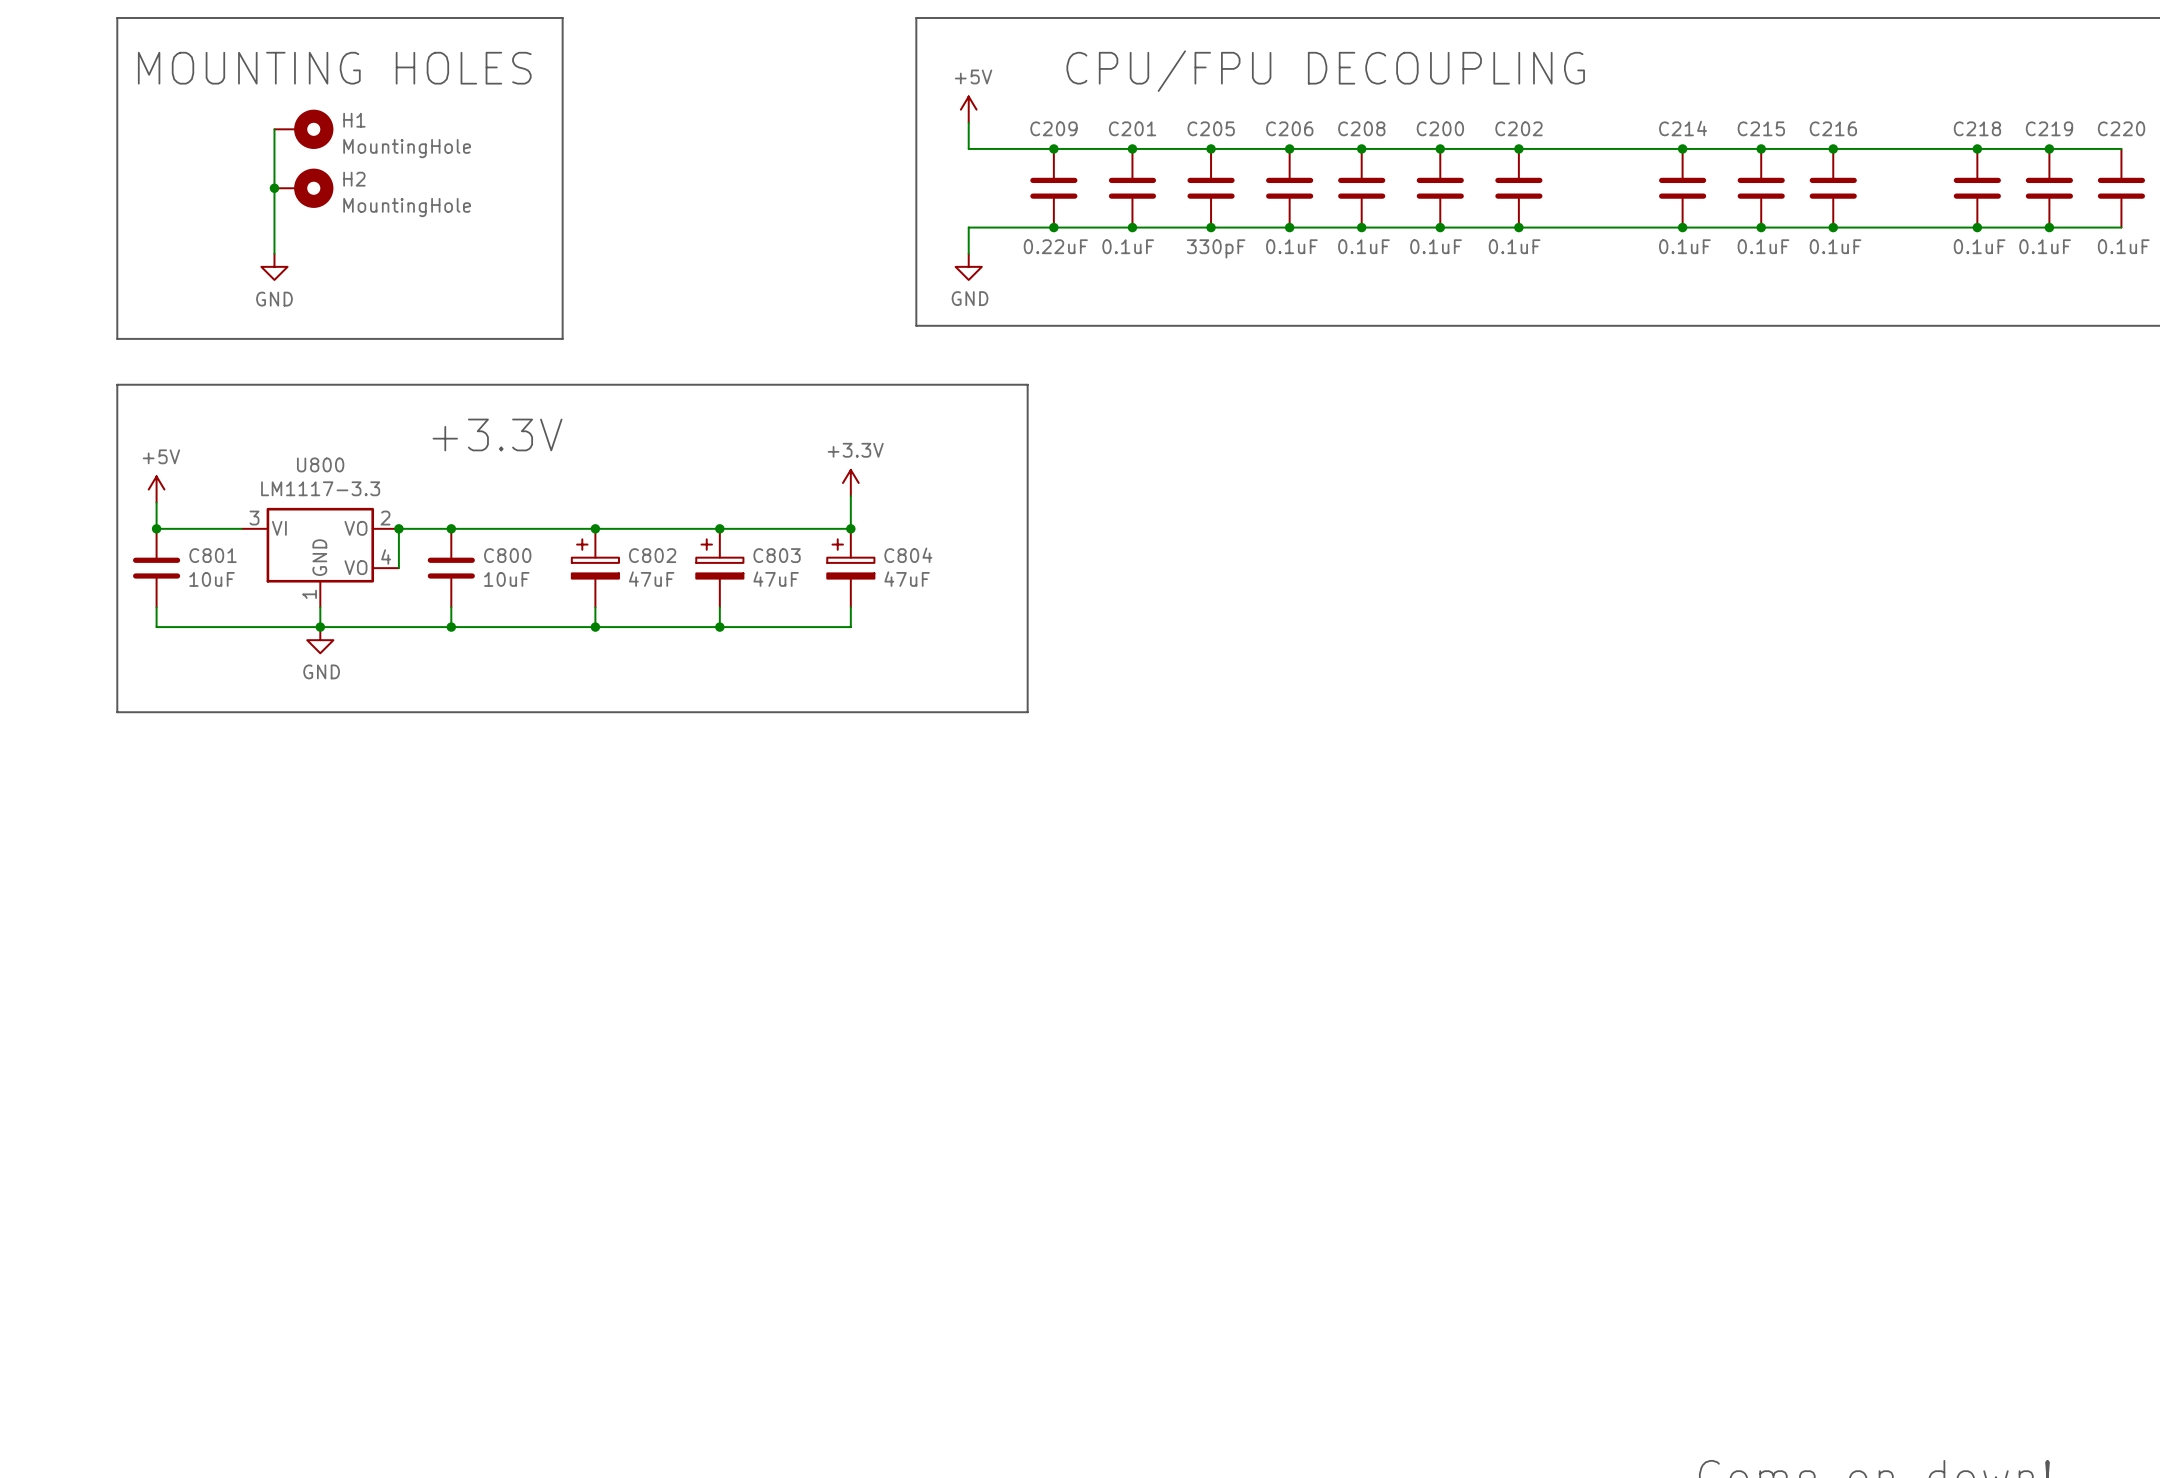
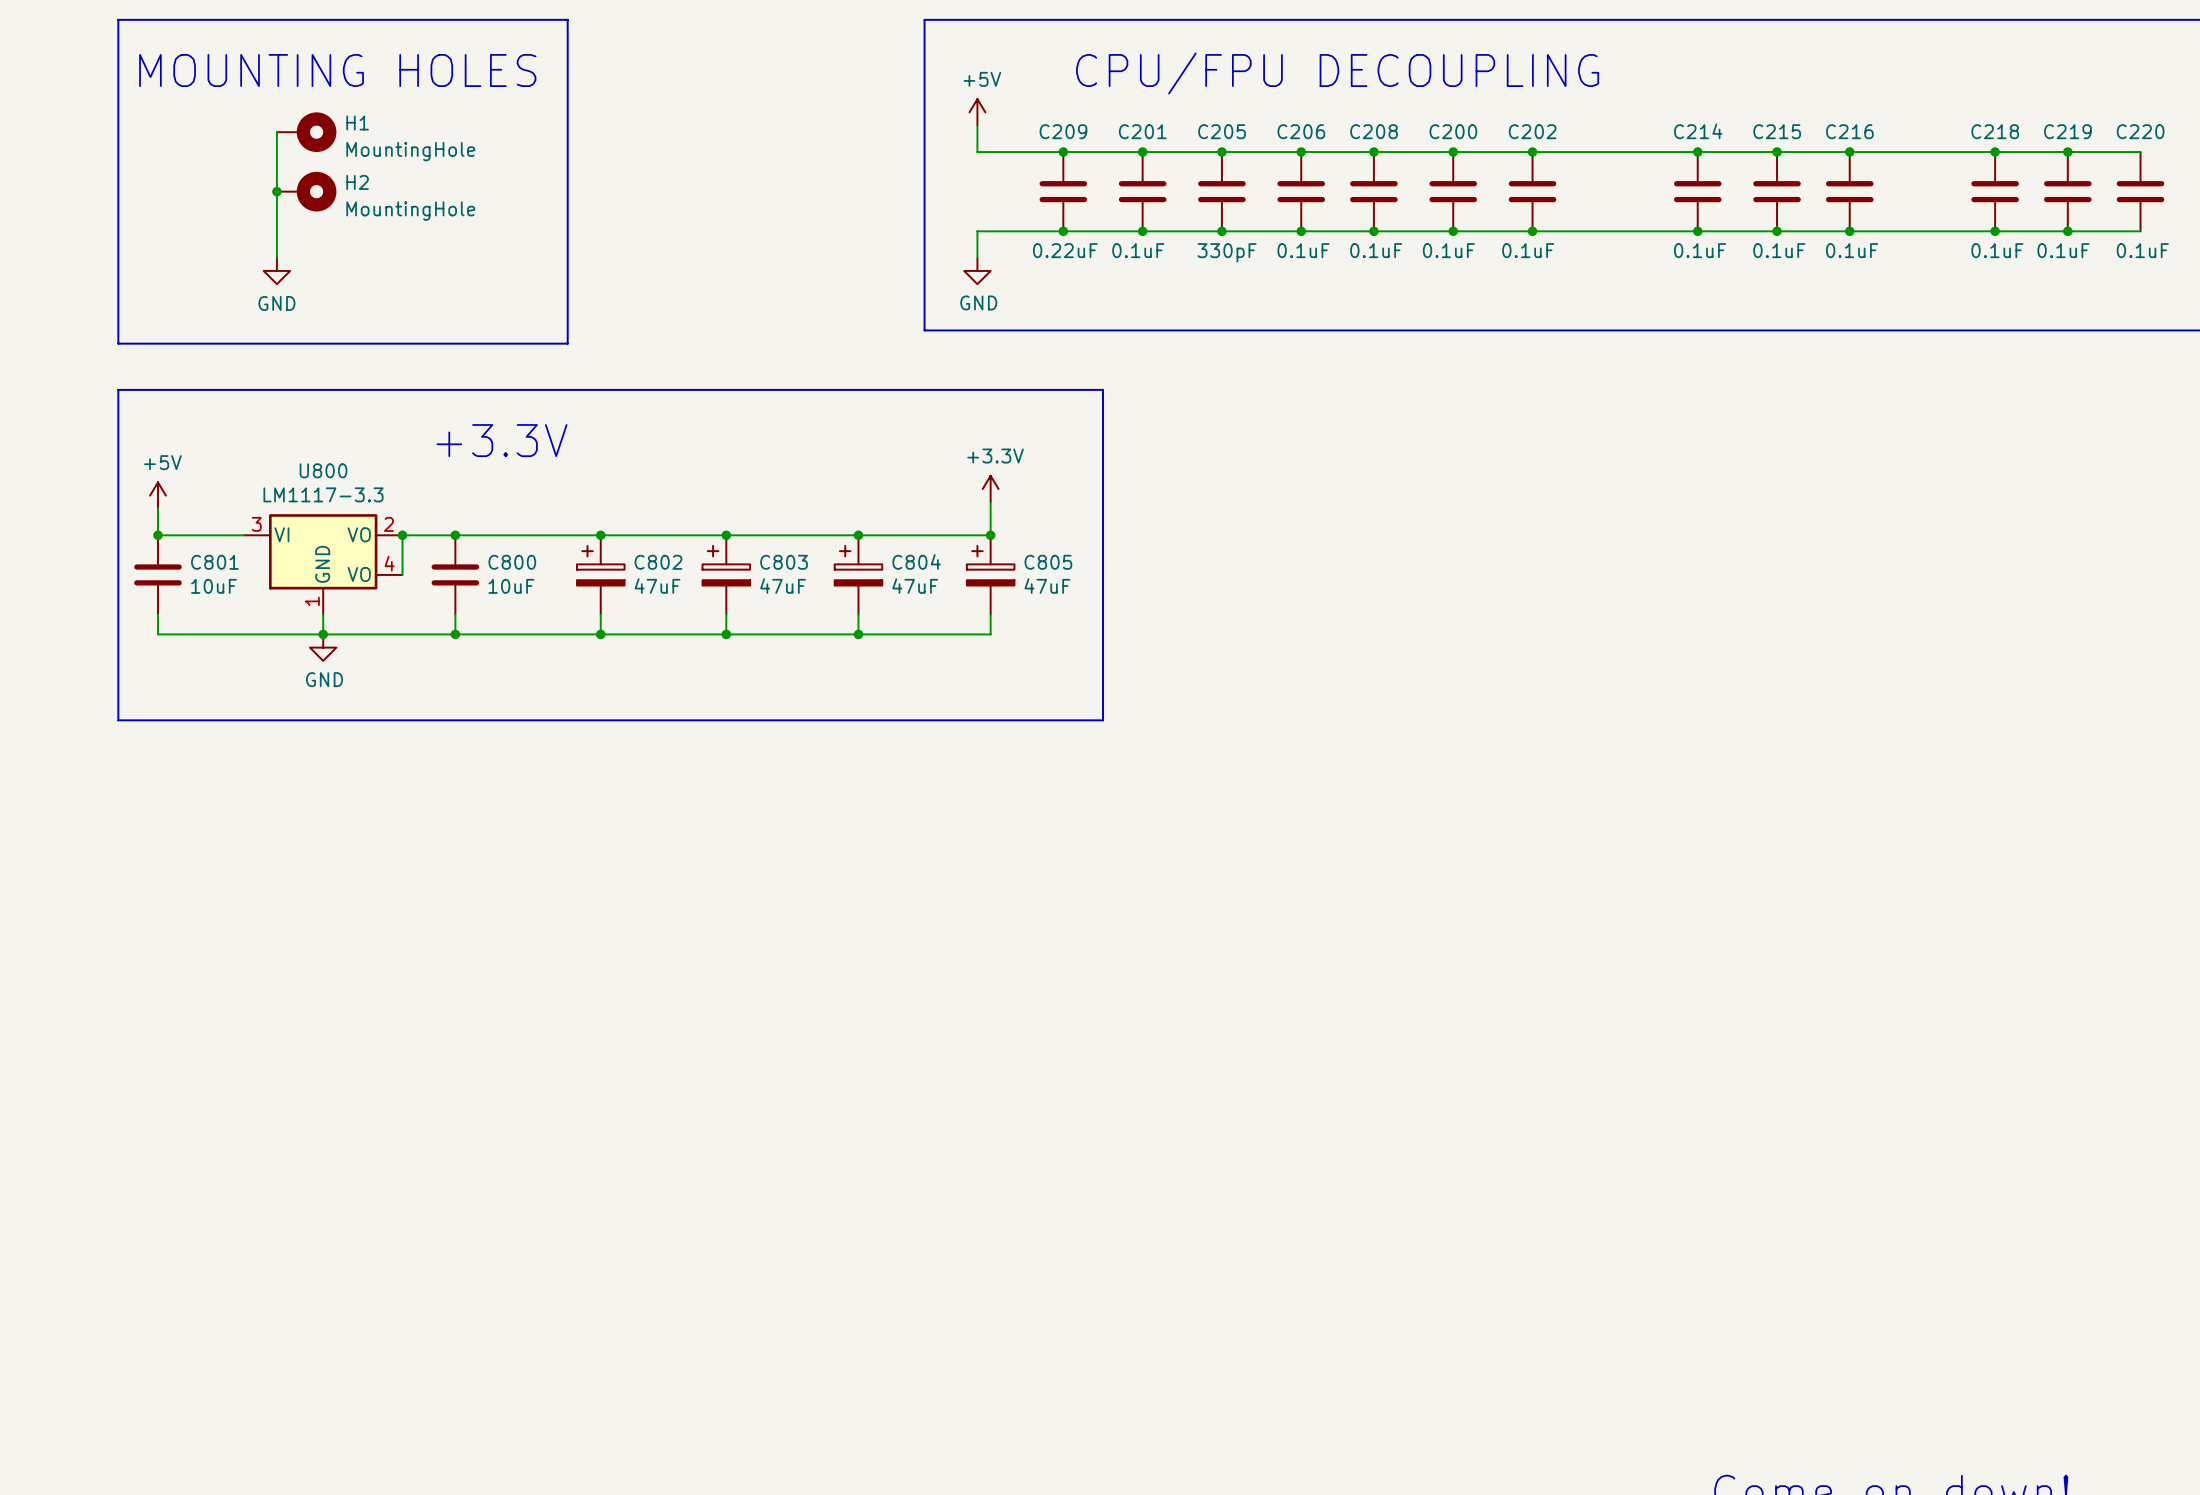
line: (1027, 384) (1027, 712) -> (1036, 389) (1102, 389) (1102, 720) (1036, 720)
power symbol position: +3.3V (850, 482) -> +3.3V (990, 489)
wire: (850, 496) (850, 528) -> (990, 502) (990, 535) (858, 535)
junction: none -> (990, 535)
C805: none -> 47uF (990, 574)
wire: none -> (990, 614) (990, 634) (858, 634)
junction: none -> (858, 634)

